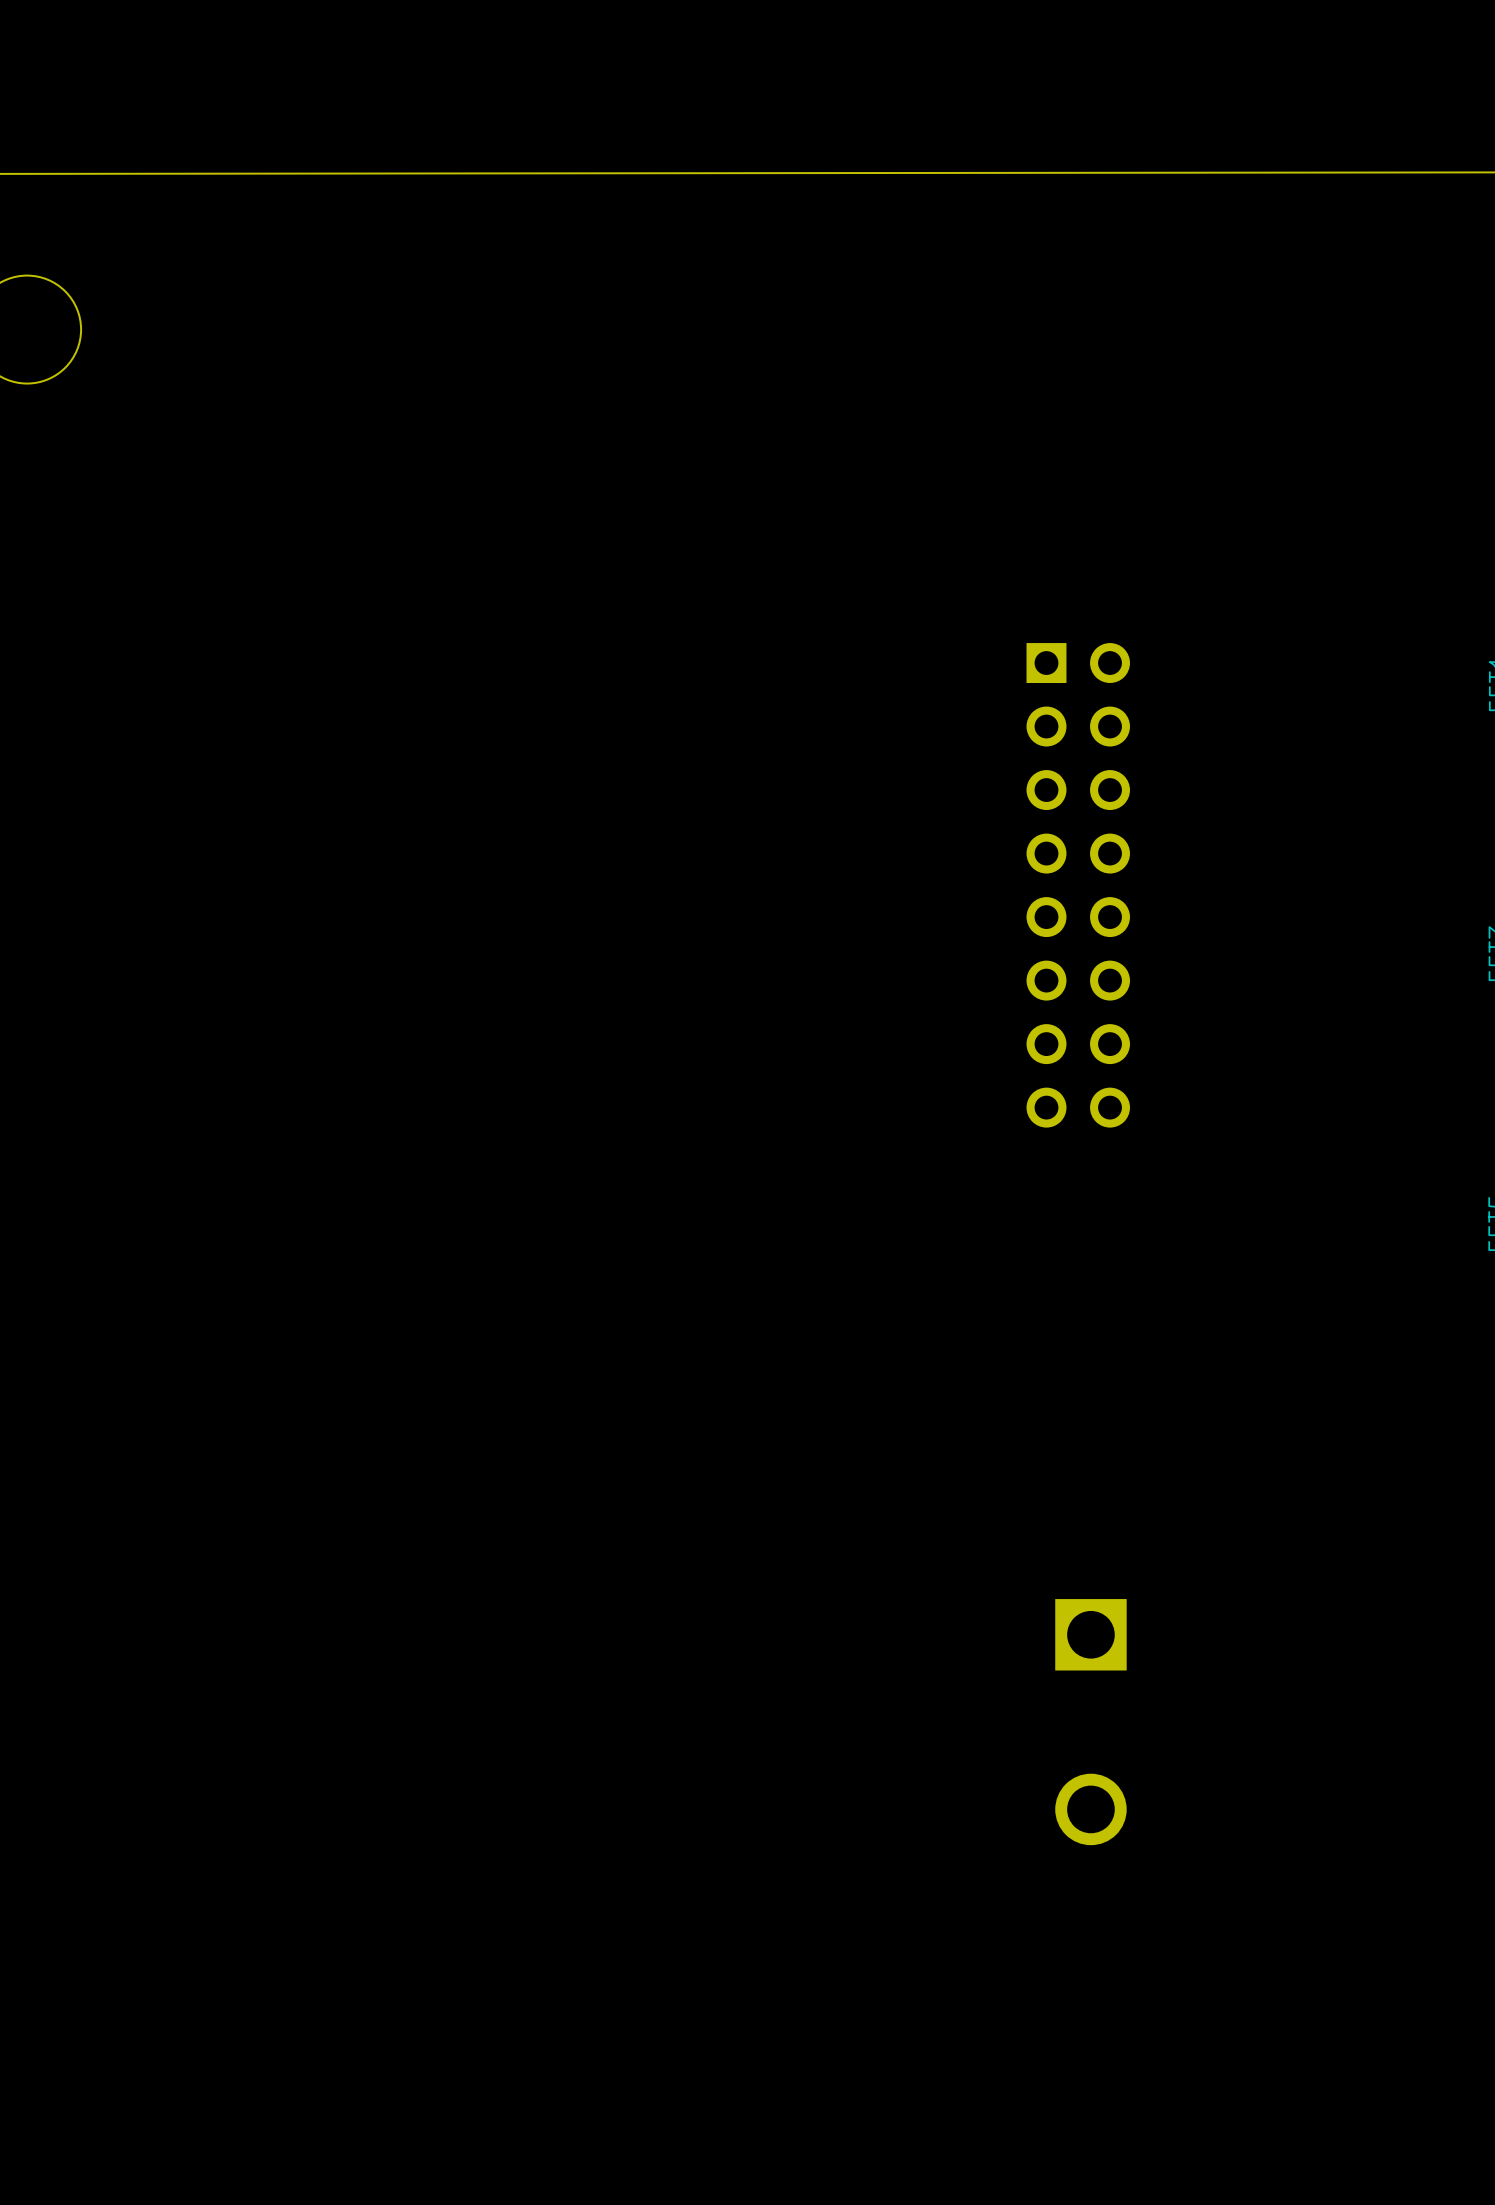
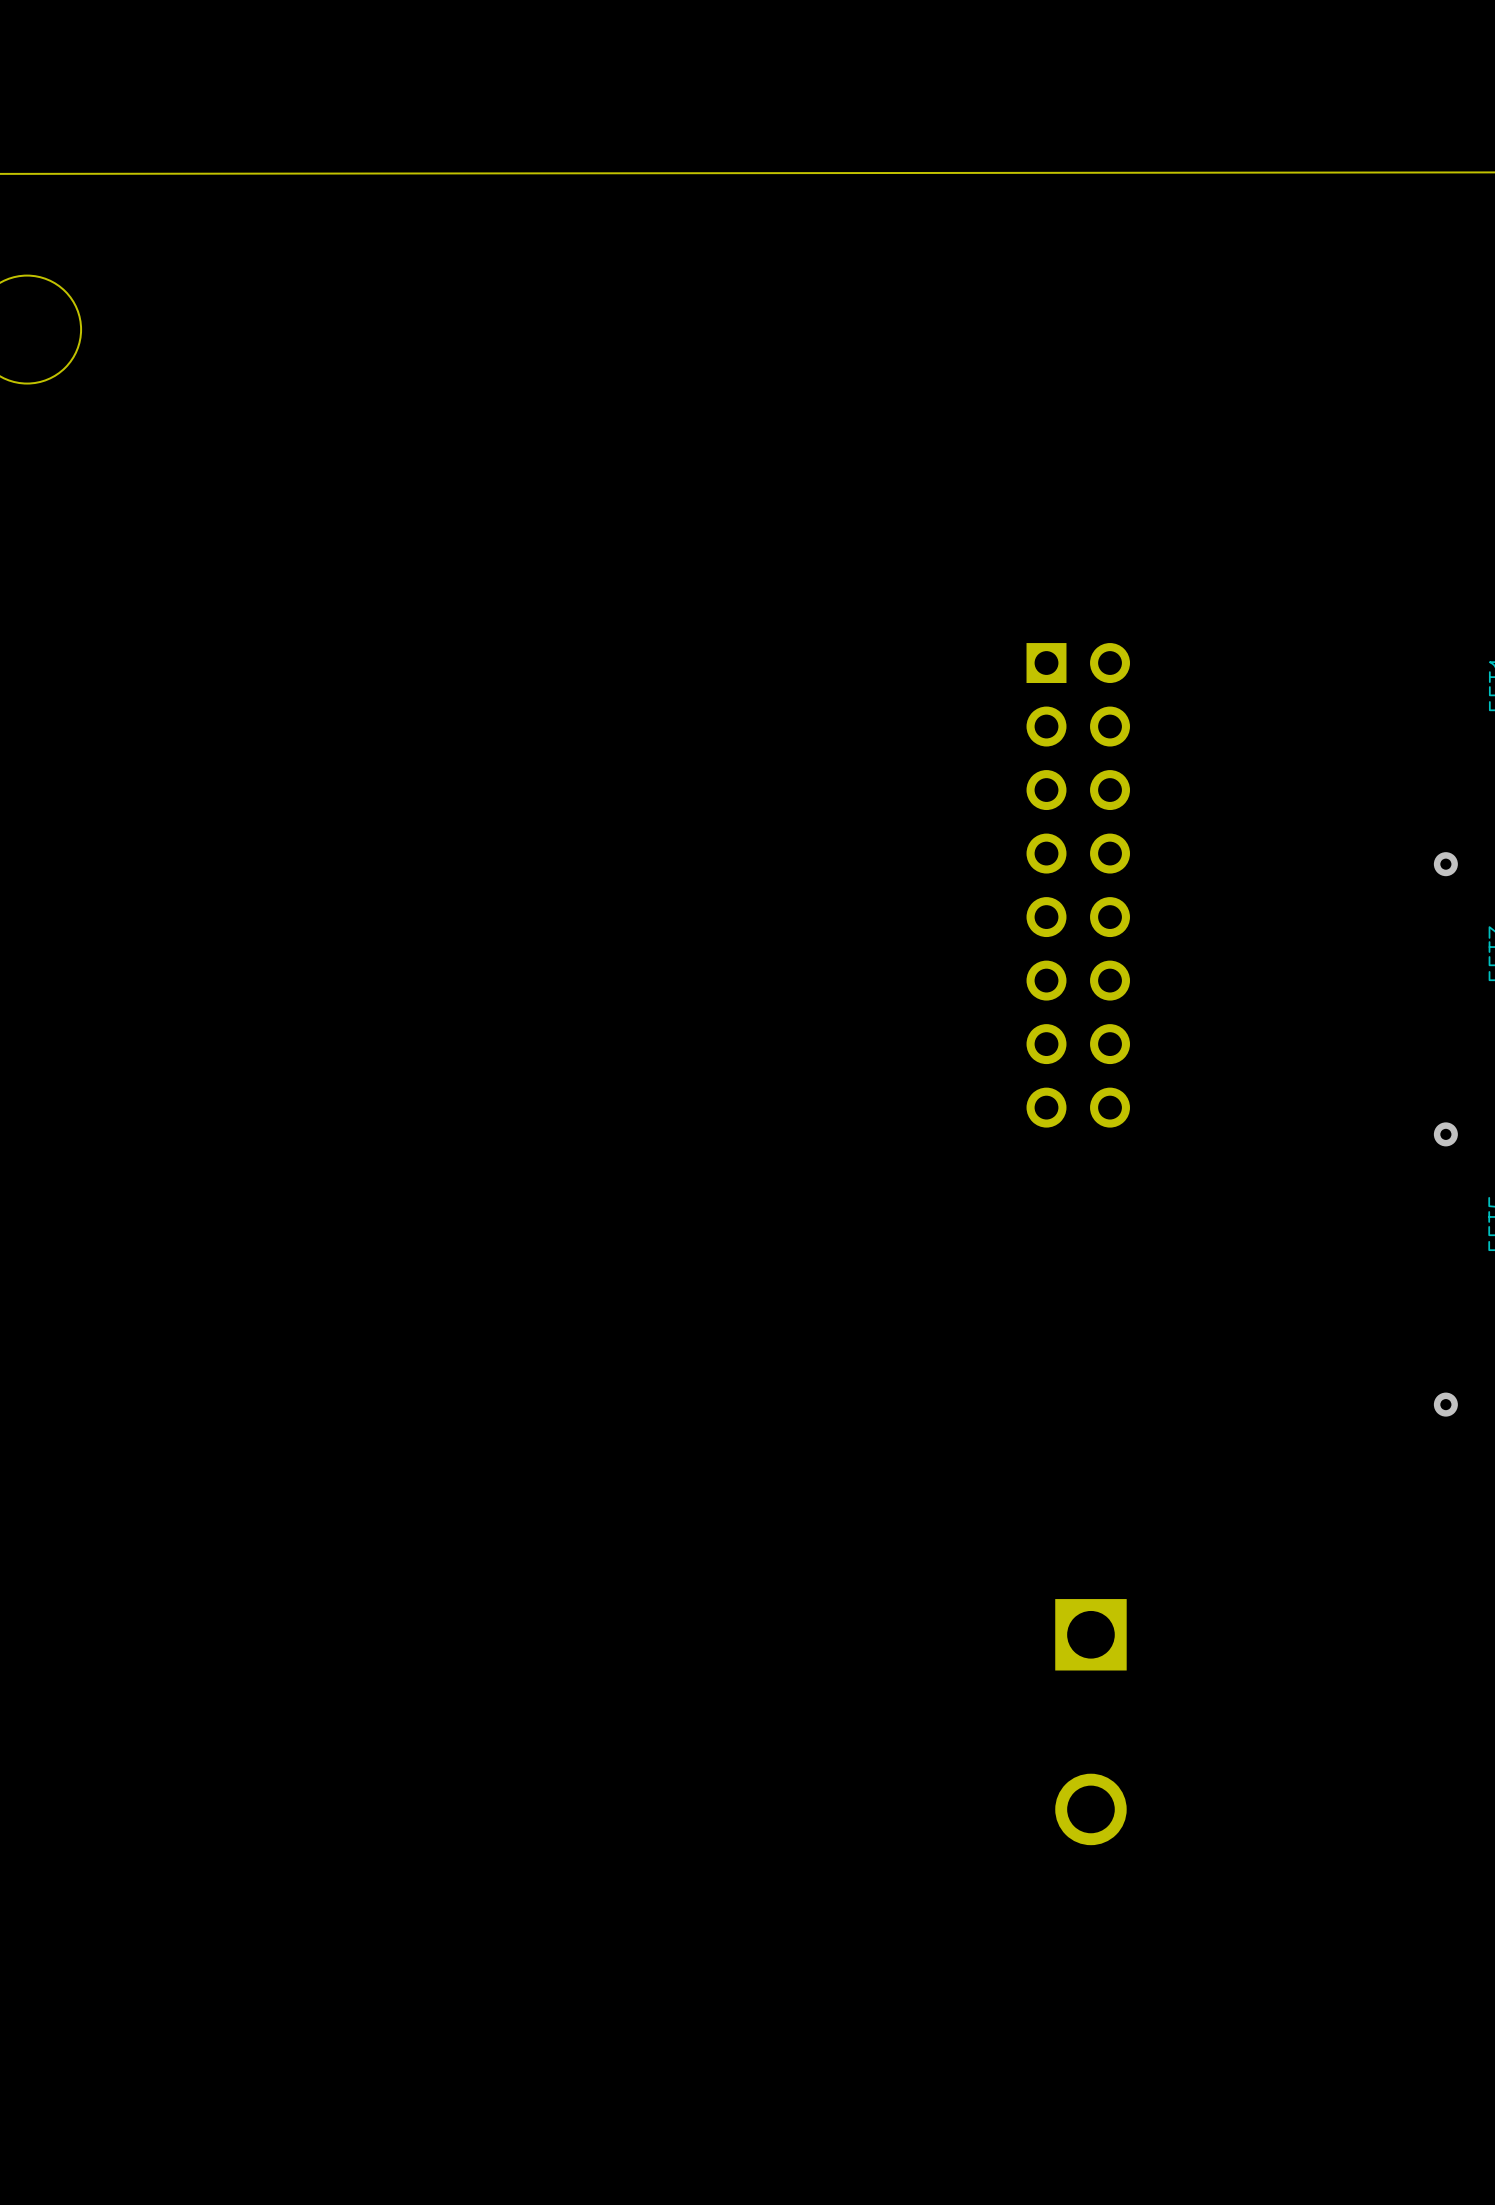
via: none -> (1445, 864)
via: none -> (1445, 1134)
via: none -> (1445, 1404)

